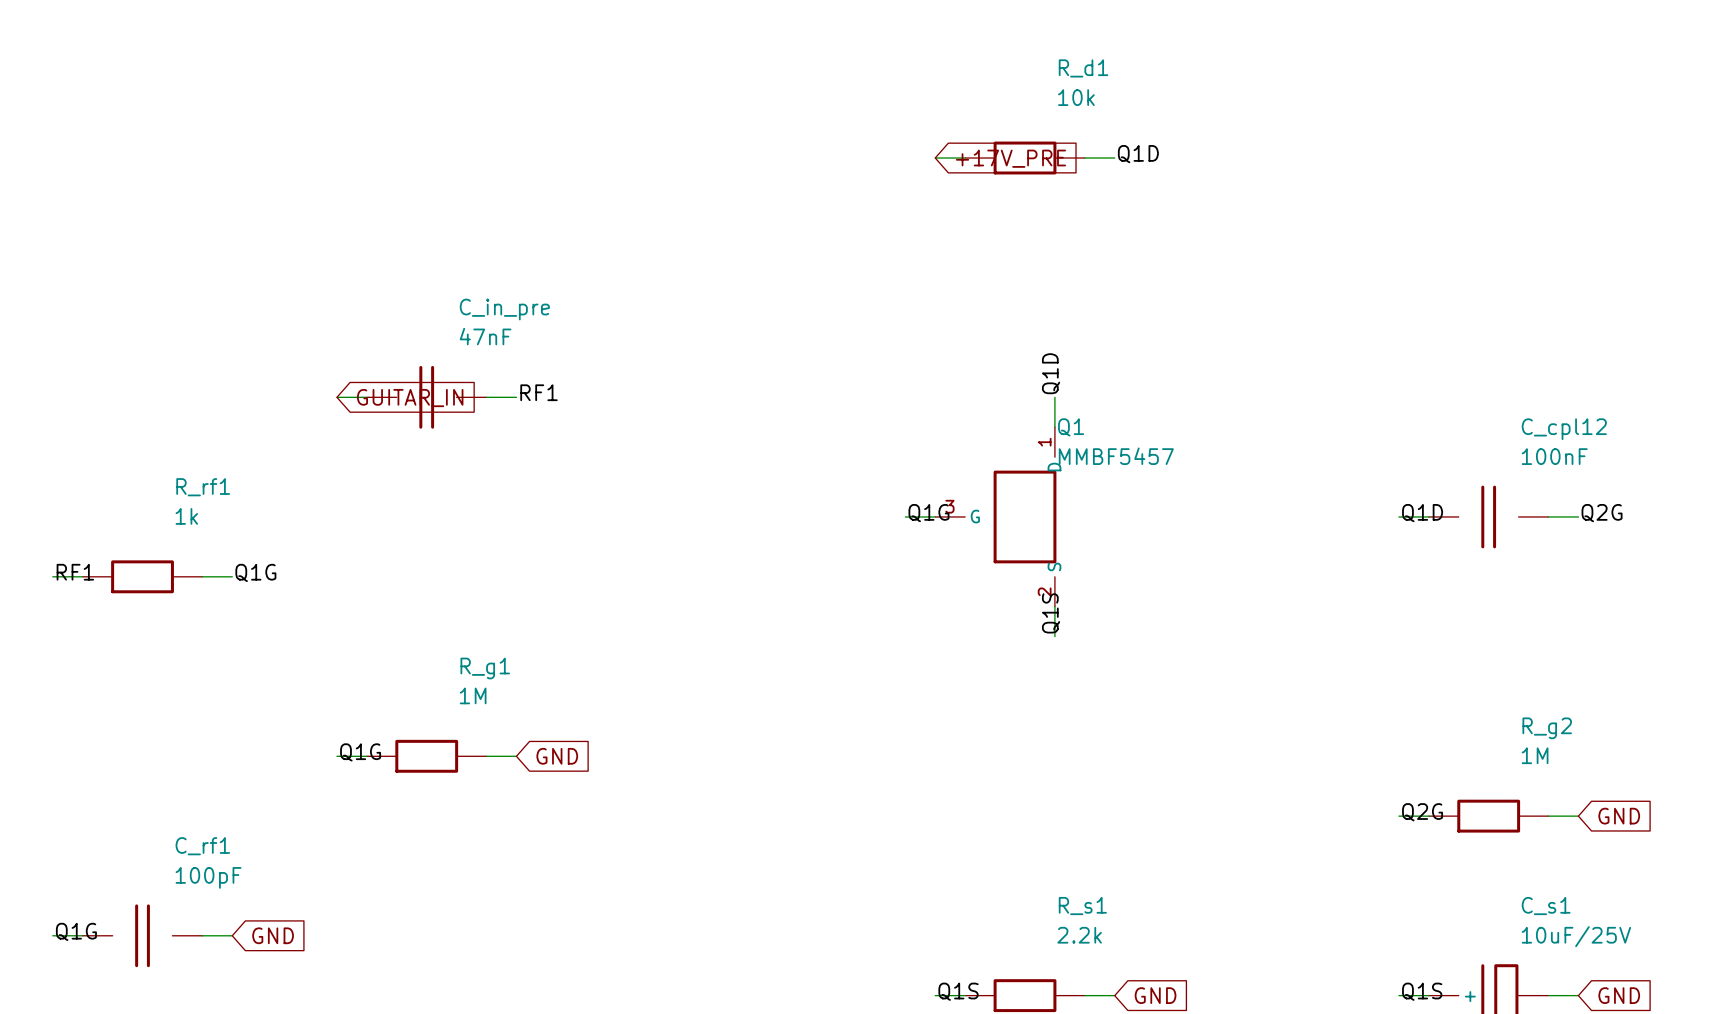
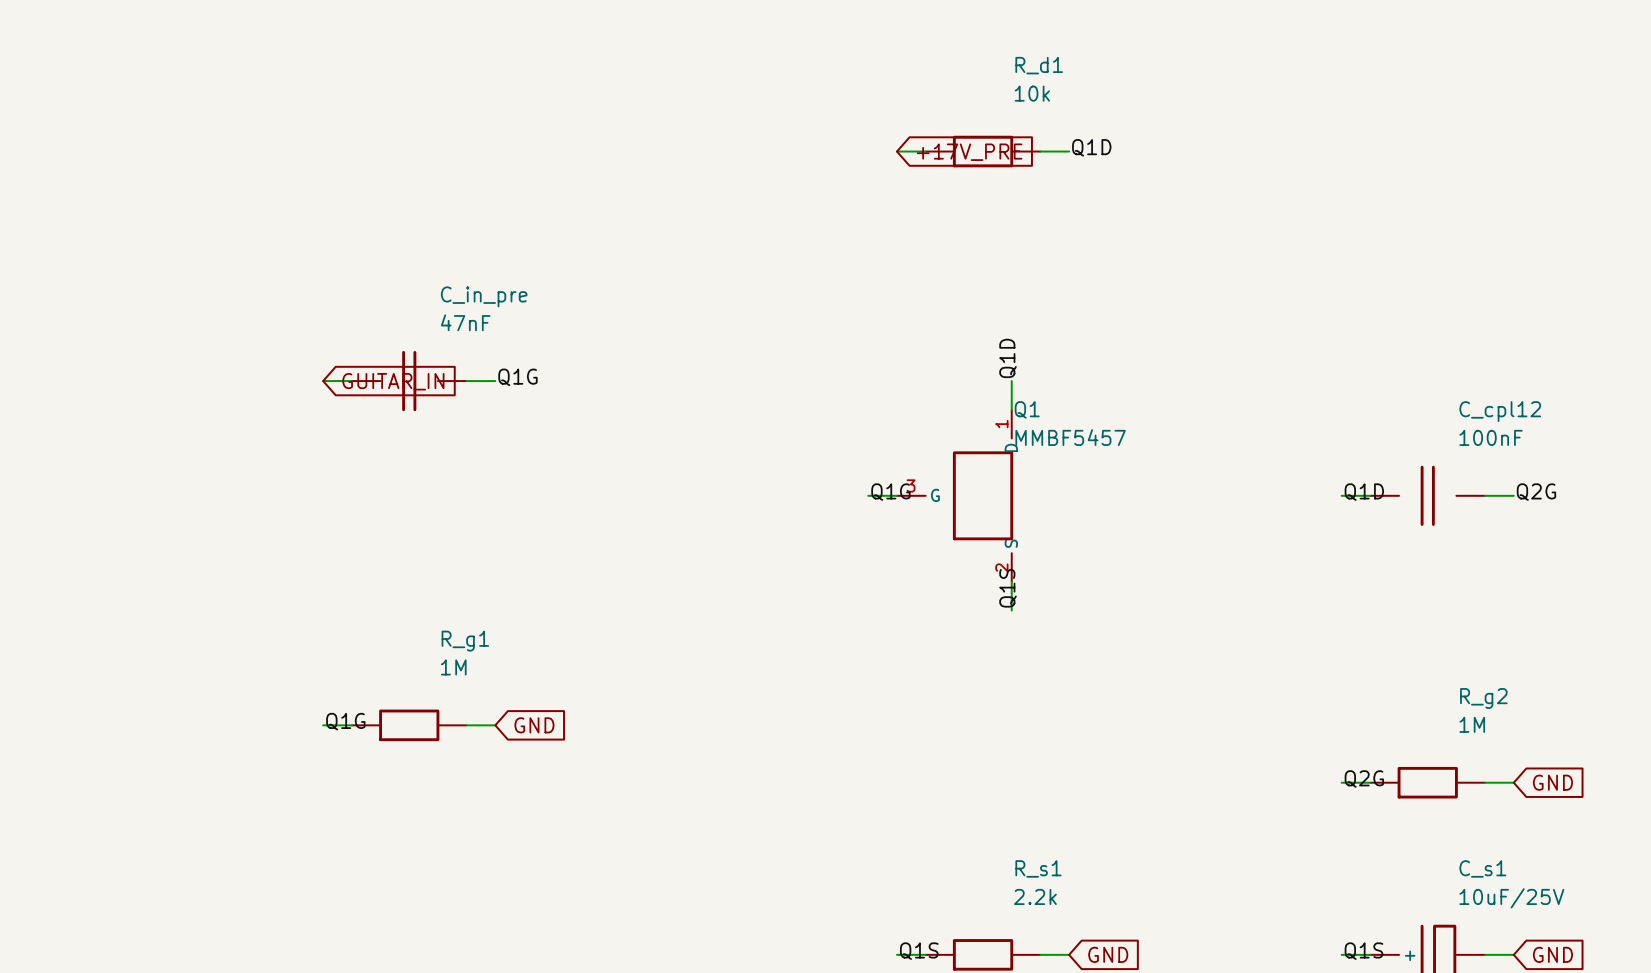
label: RF1 (539, 392) -> Q1G (517, 377)
label: RF1 (75, 572) -> none
label: Q1G (255, 572) -> none
wire: (52, 576) (82, 576) -> none
R_rf1: 1k (142, 576) -> none
wire: (202, 576) (232, 576) -> none
label: Q1G (76, 931) -> none
wire: (52, 935) (82, 935) -> none
C_rf1: 100pF (142, 935) -> none
wire: (202, 935) (232, 935) -> none
global label: GND (273, 935) -> none

